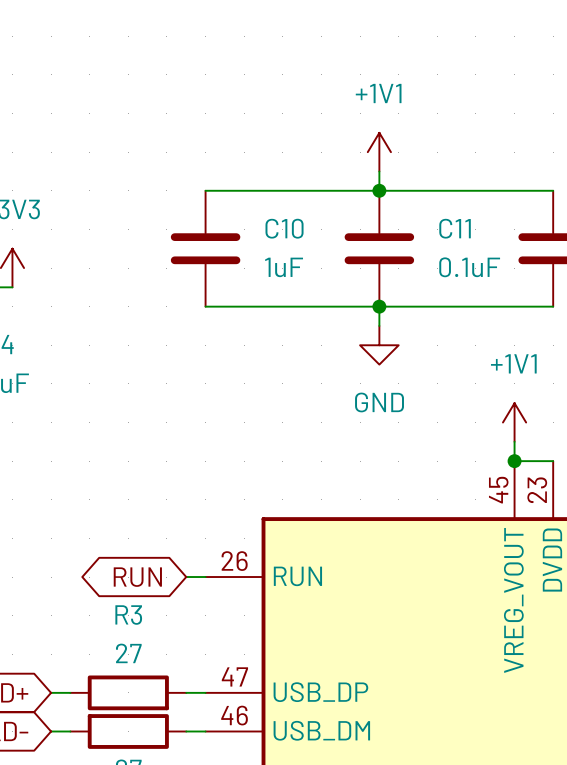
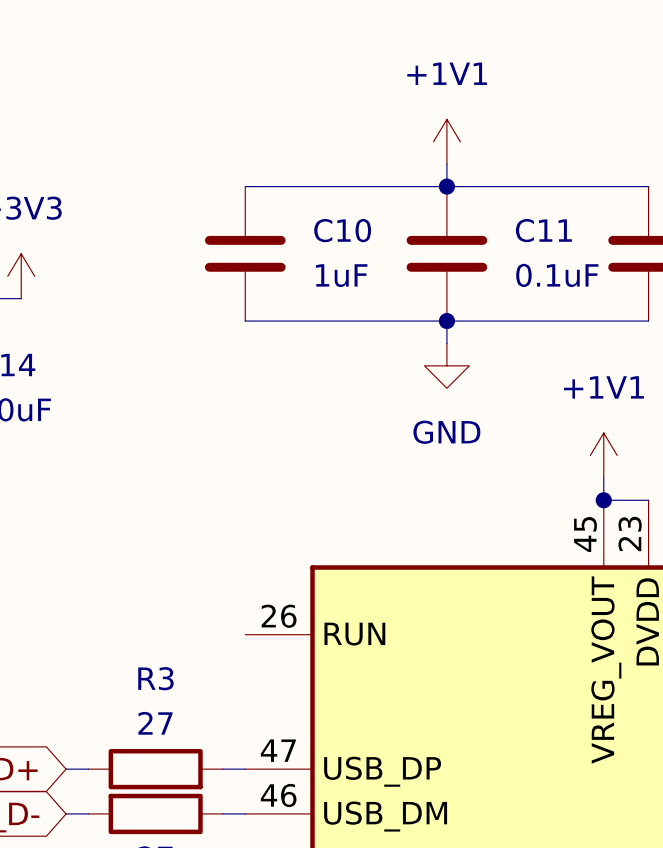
global label: RUN (137, 577) -> none
wire: (186, 577) (205, 577) -> none

